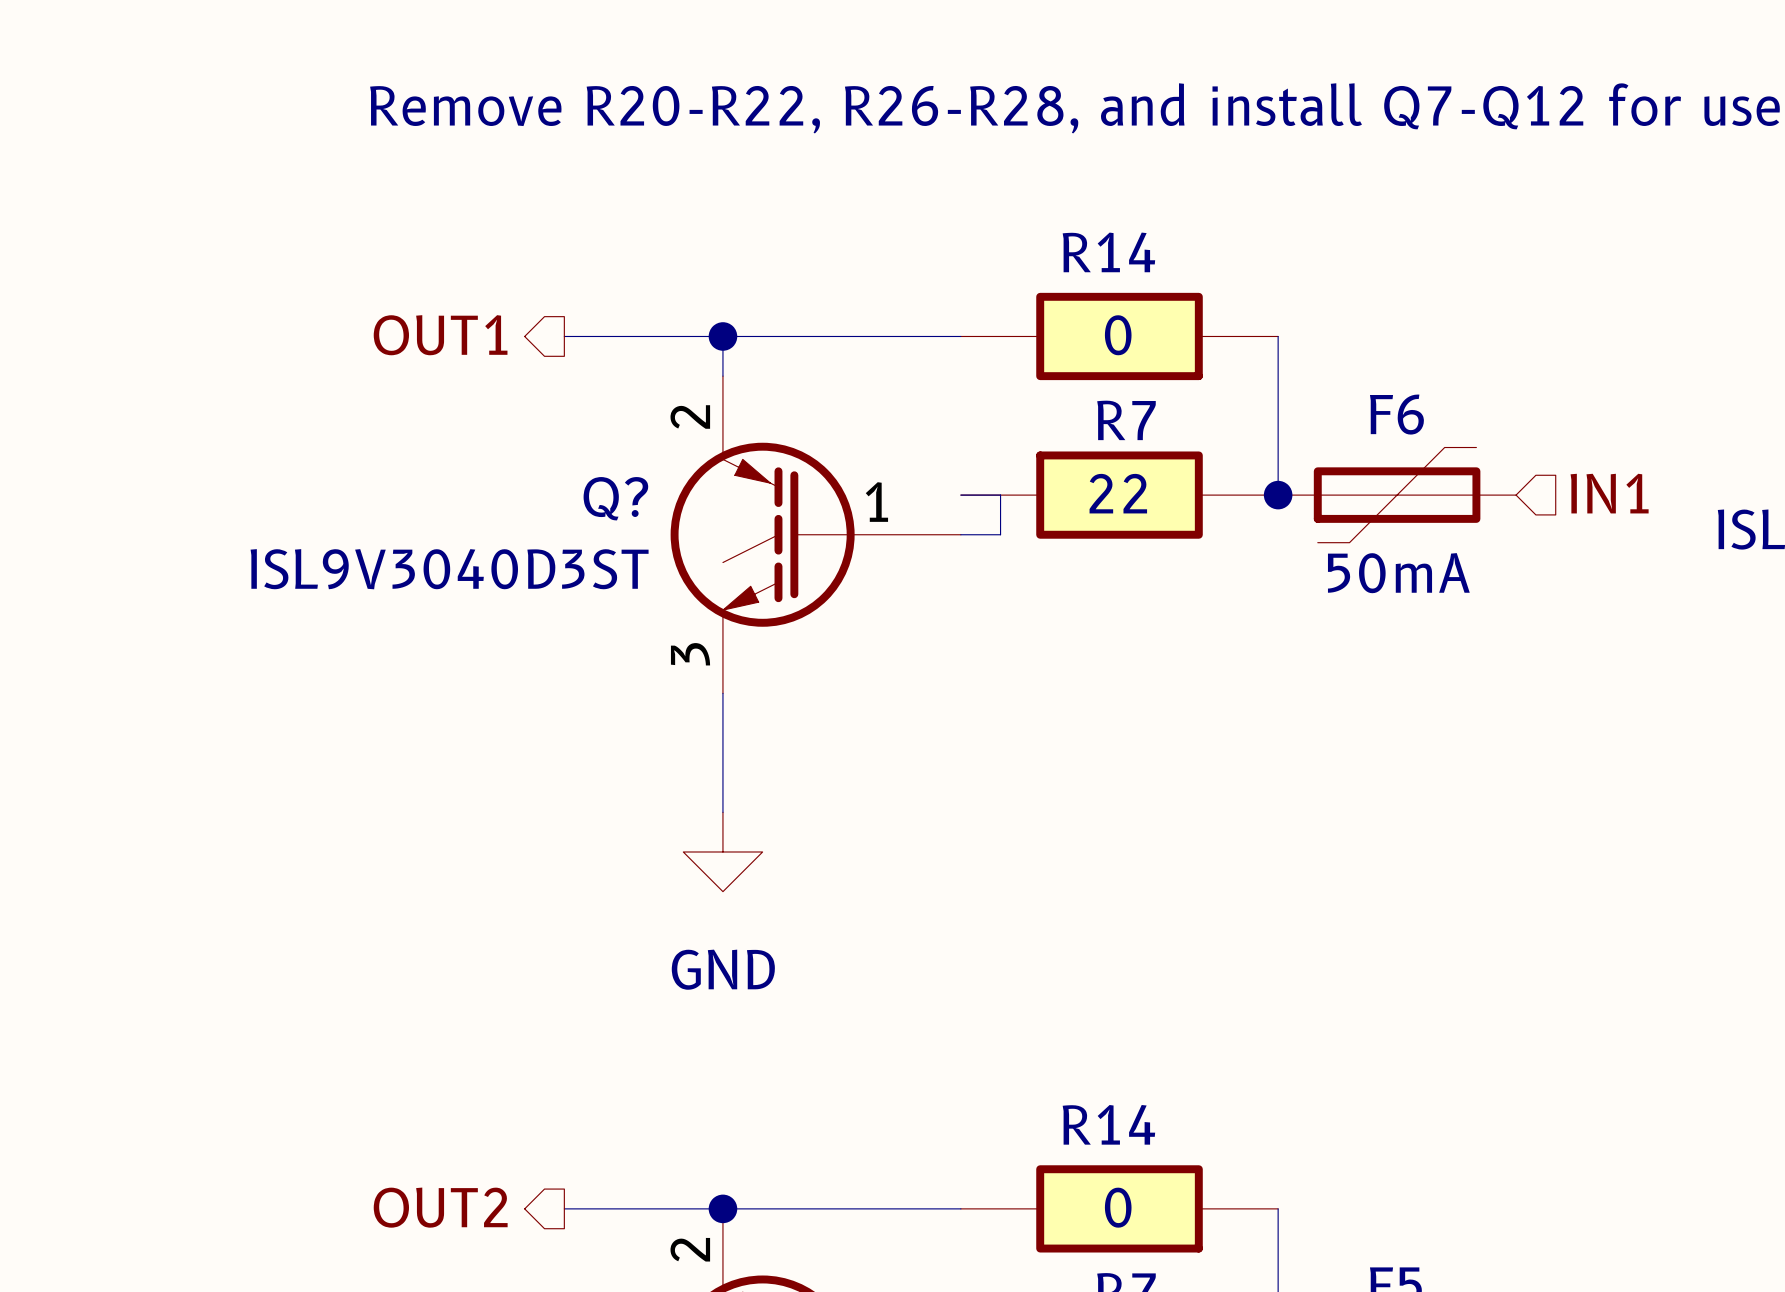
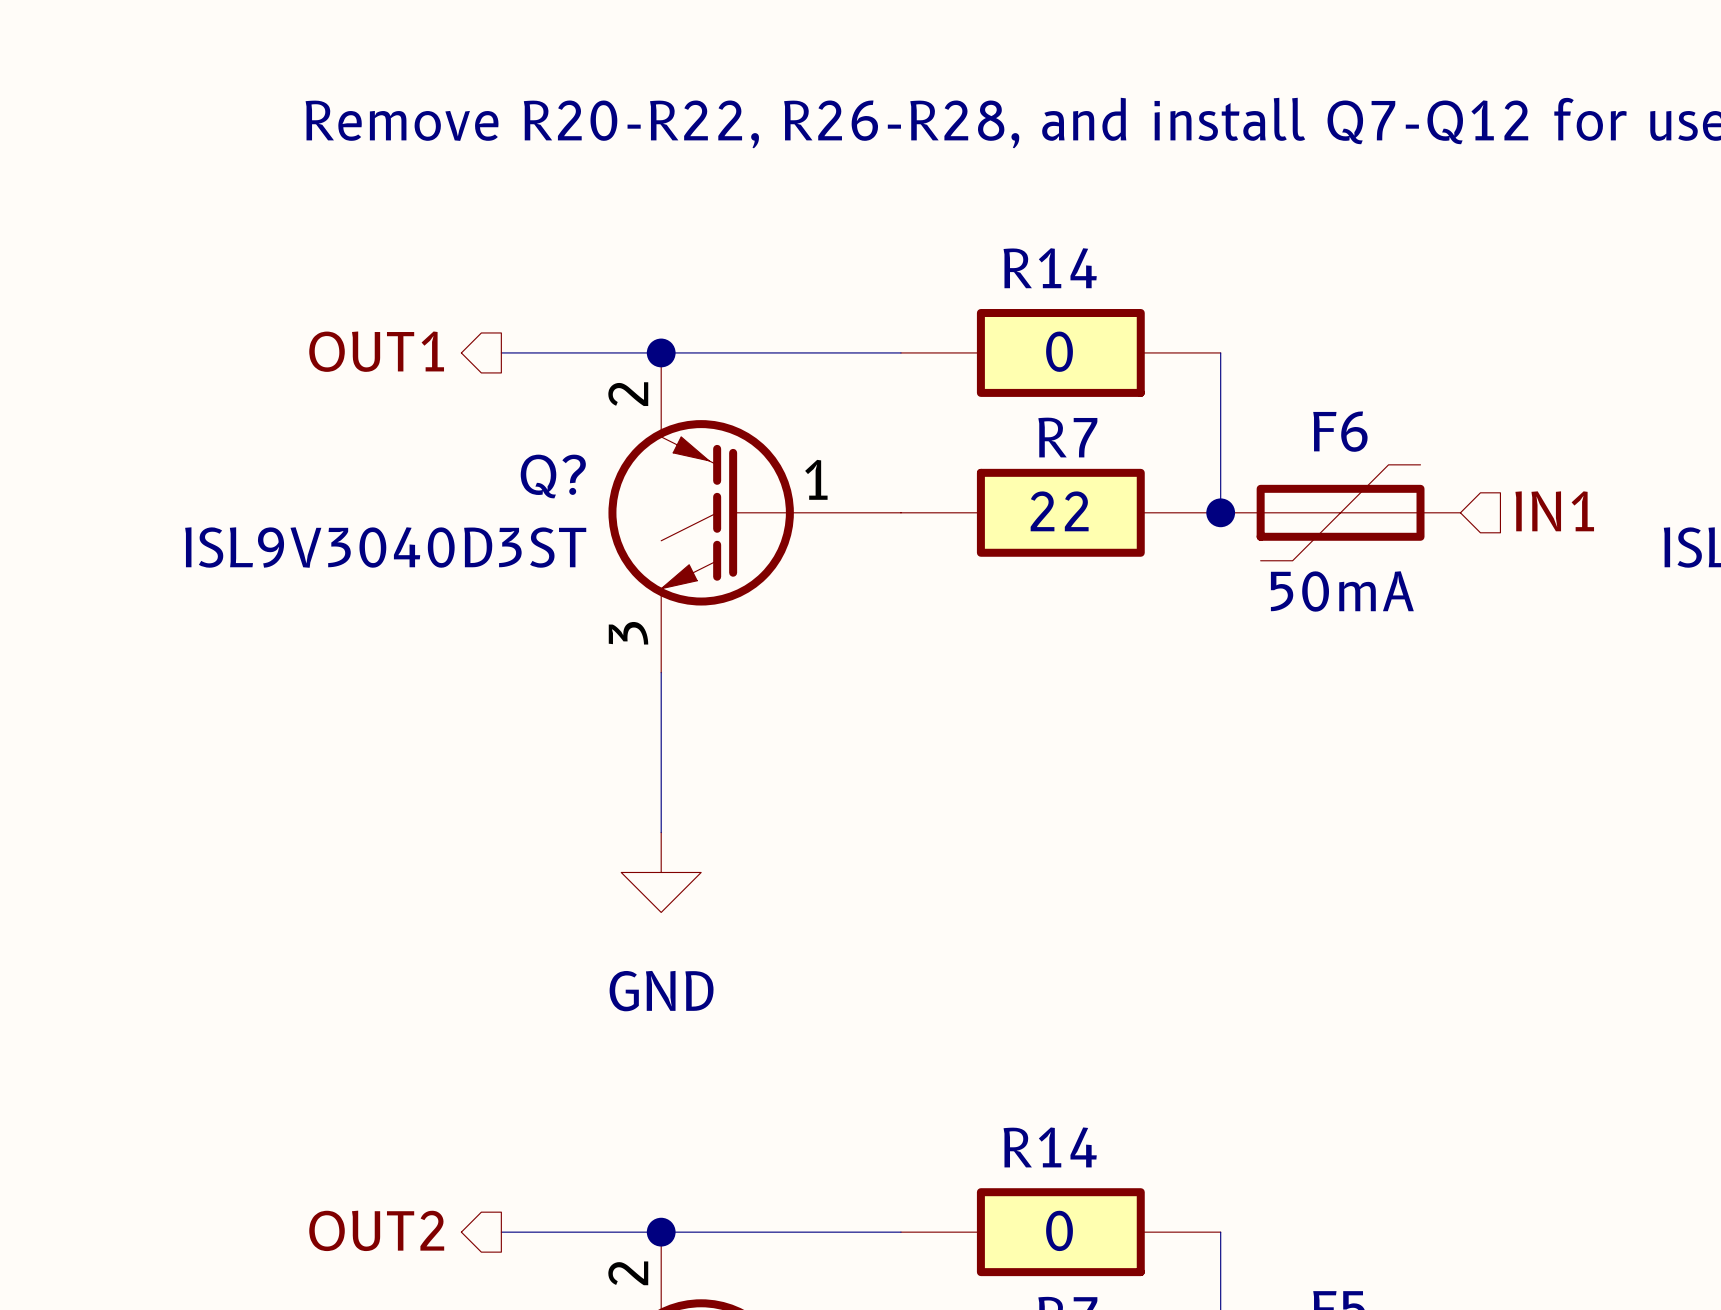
wire: (960, 495) (1000, 495) (1000, 534) (960, 534) -> none
Q? position: (815, 534) -> (754, 512)

